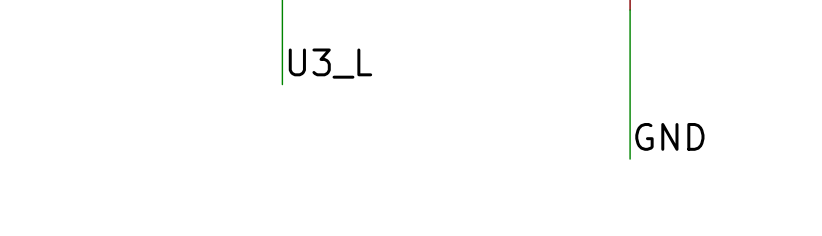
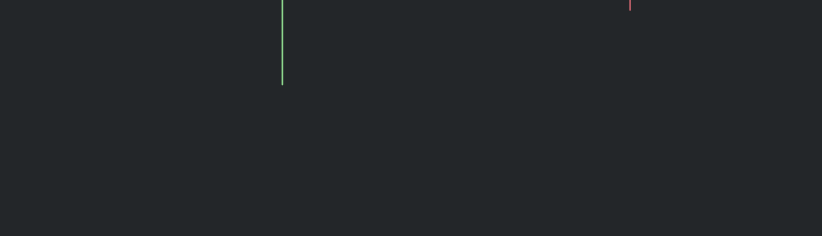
wire: (630, 10) (630, 159) -> none
label: U3_L (330, 63) -> none
label: GND (669, 136) -> none

